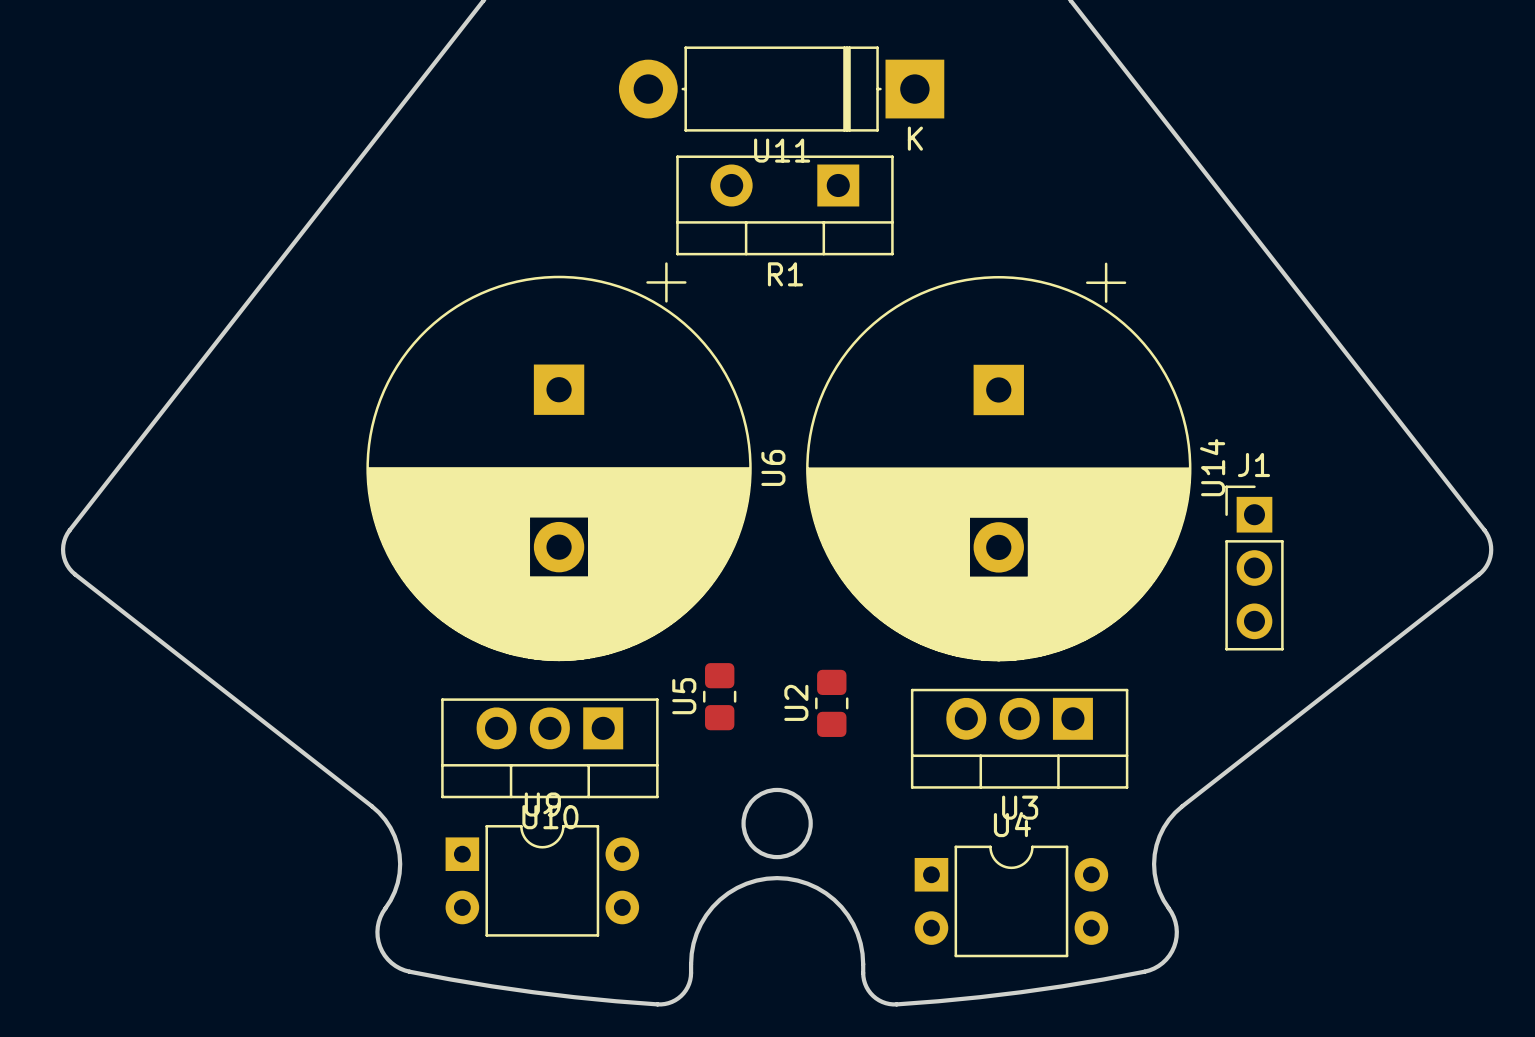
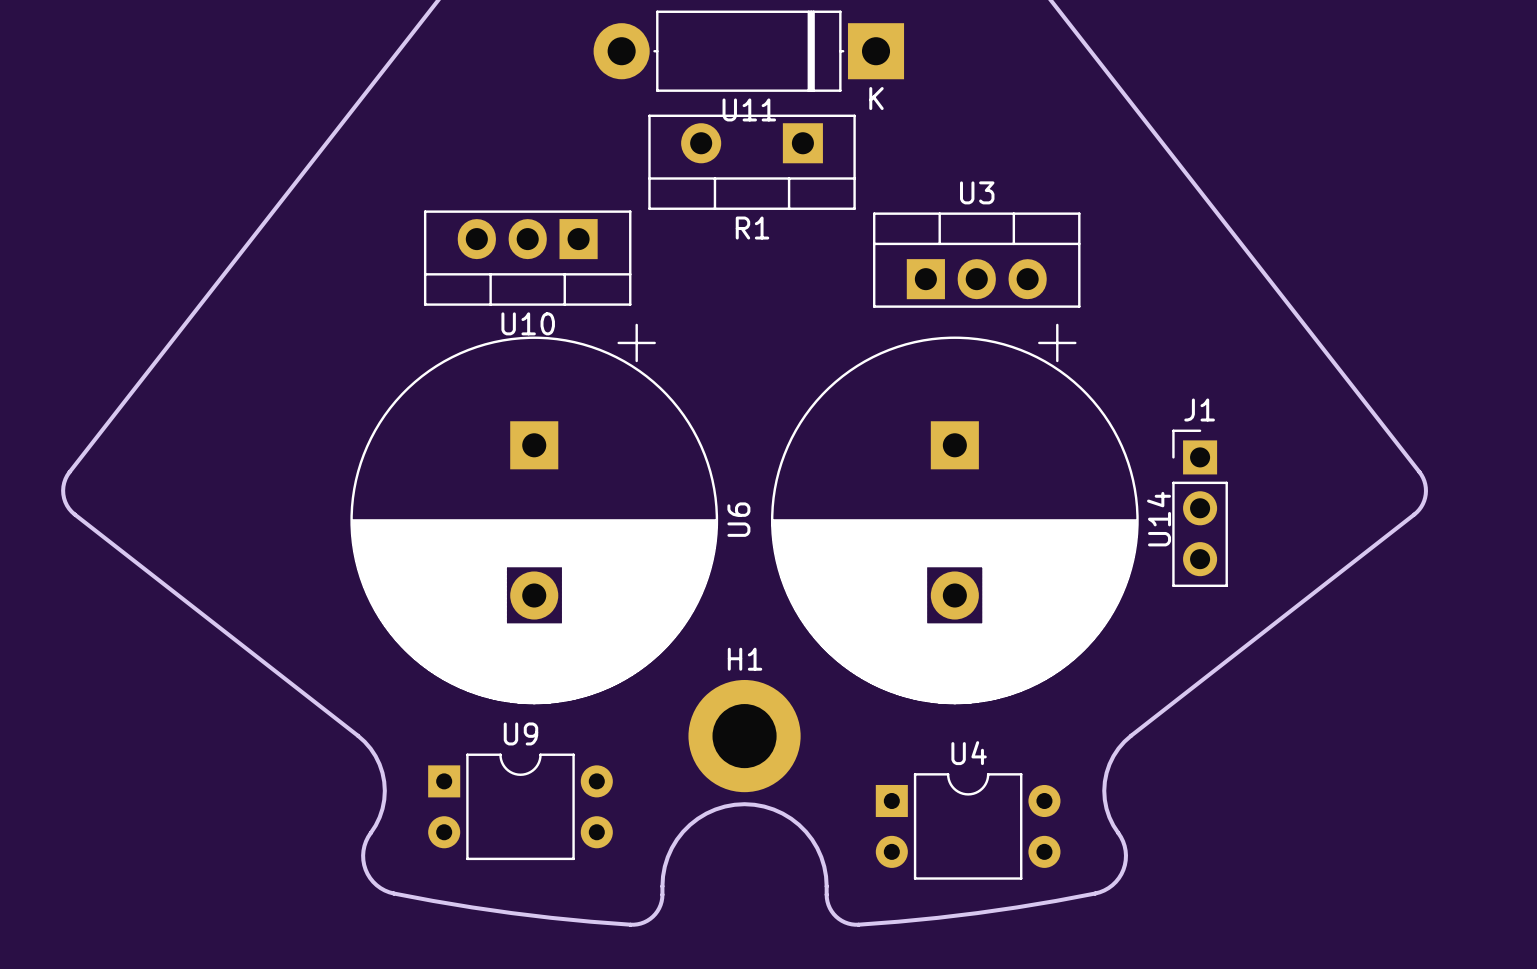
U6 position: (559, 461) -> (534, 513)
U14 position: (998, 461) -> (954, 513)
U5: (719, 696) -> none
U2: (831, 703) -> none
U3 rotation: 0° (1019, 738) -> 180° (976, 260)
U3 position: (1019, 738) -> (976, 260)
U10 position: (549, 748) -> (527, 258)
round board edge: [741, 787, 813, 860] -> none
H1: none -> (744, 736)

